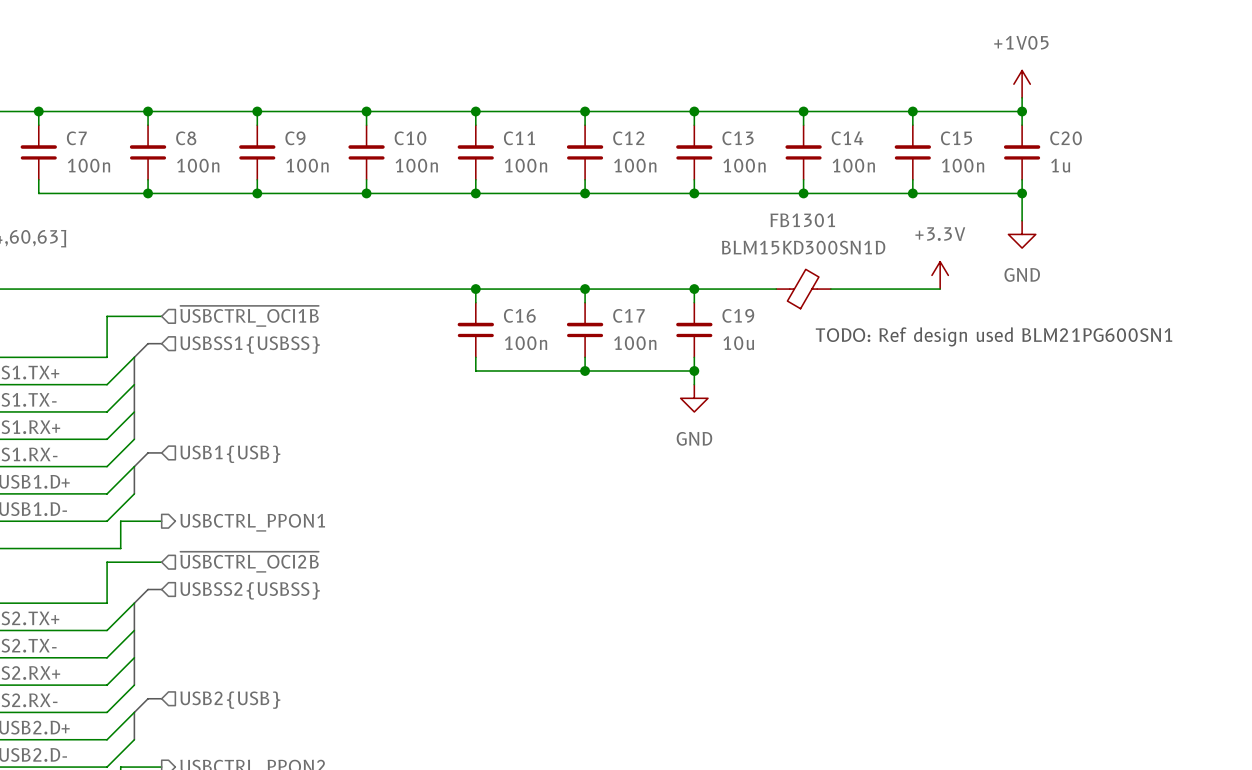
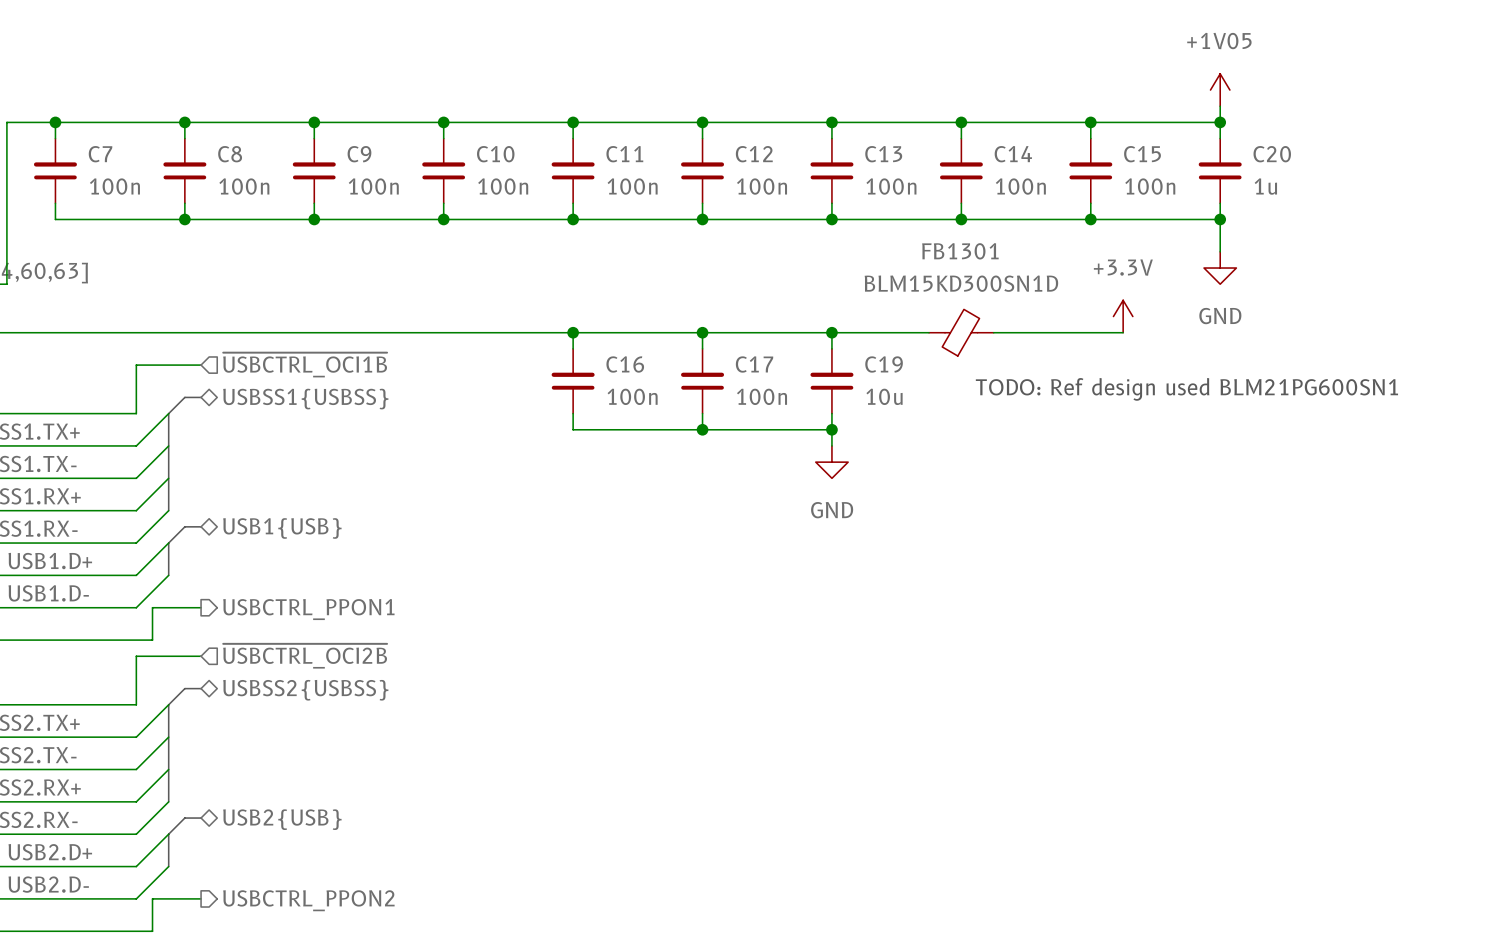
hierarchical label shape: input (250, 345) -> bidirectional (305, 399)
hierarchical label shape: input (230, 454) -> bidirectional (282, 528)
hierarchical label shape: input (250, 590) -> bidirectional (305, 690)
hierarchical label shape: input (230, 700) -> bidirectional (282, 819)

